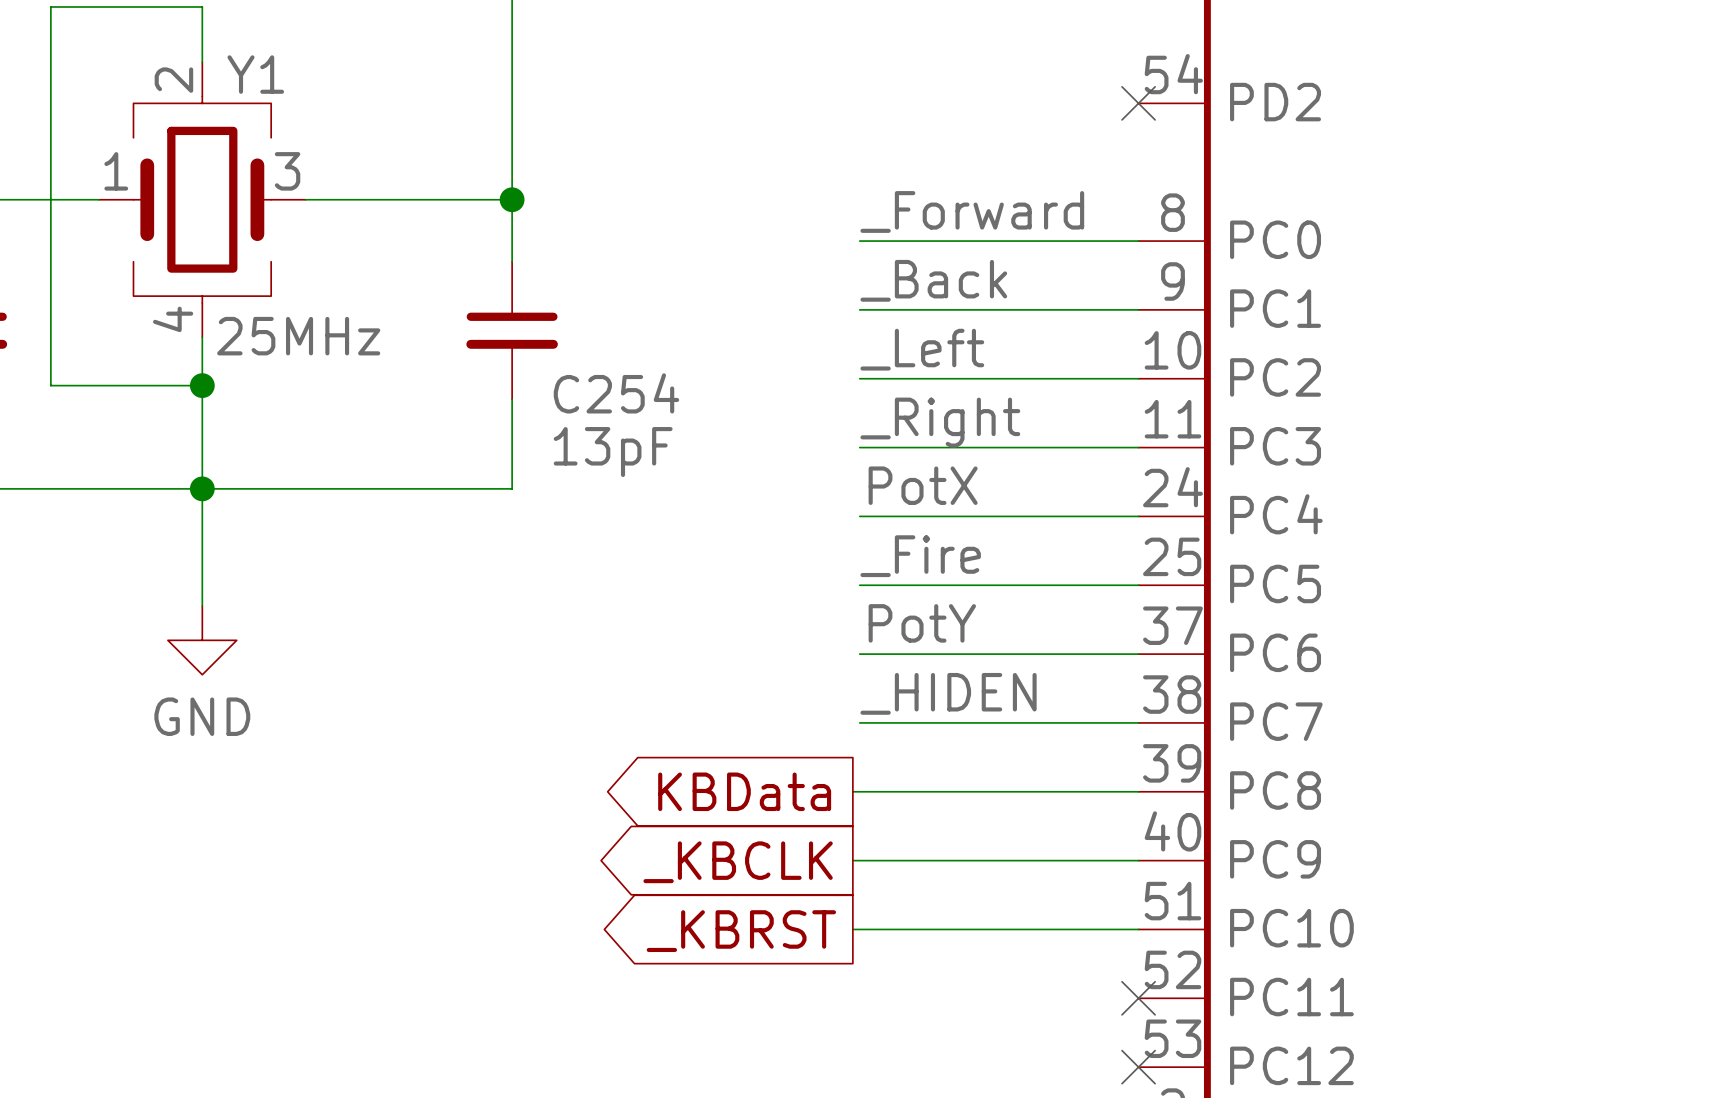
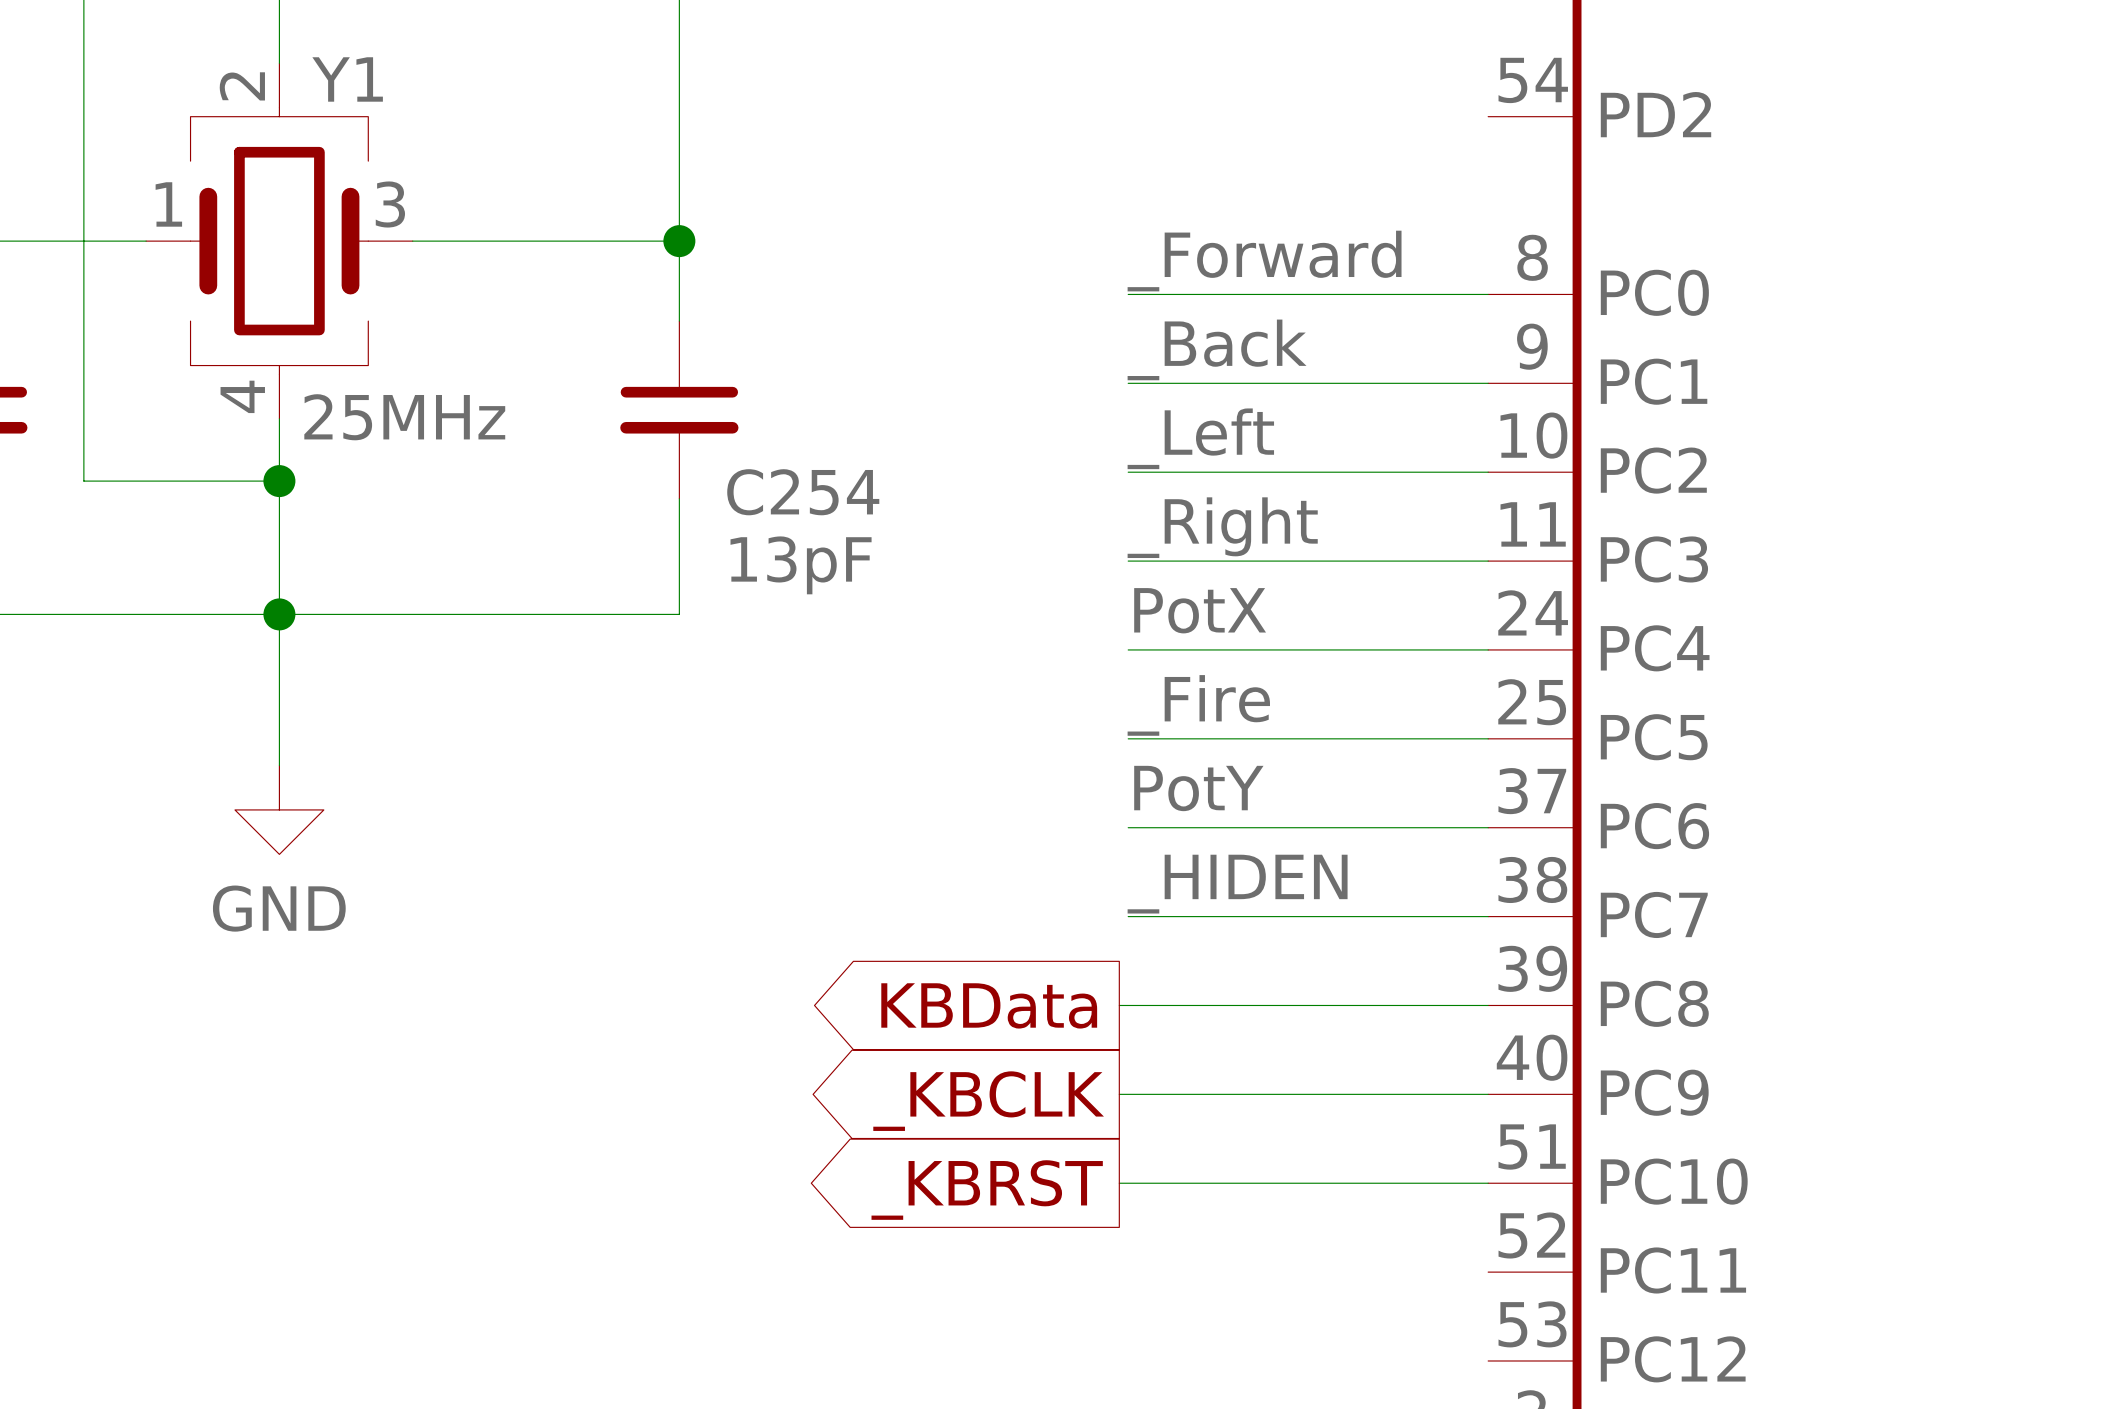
no-connect mark: (1138, 103) -> none
no-connect mark: (1138, 998) -> none
no-connect mark: (1138, 1067) -> none

